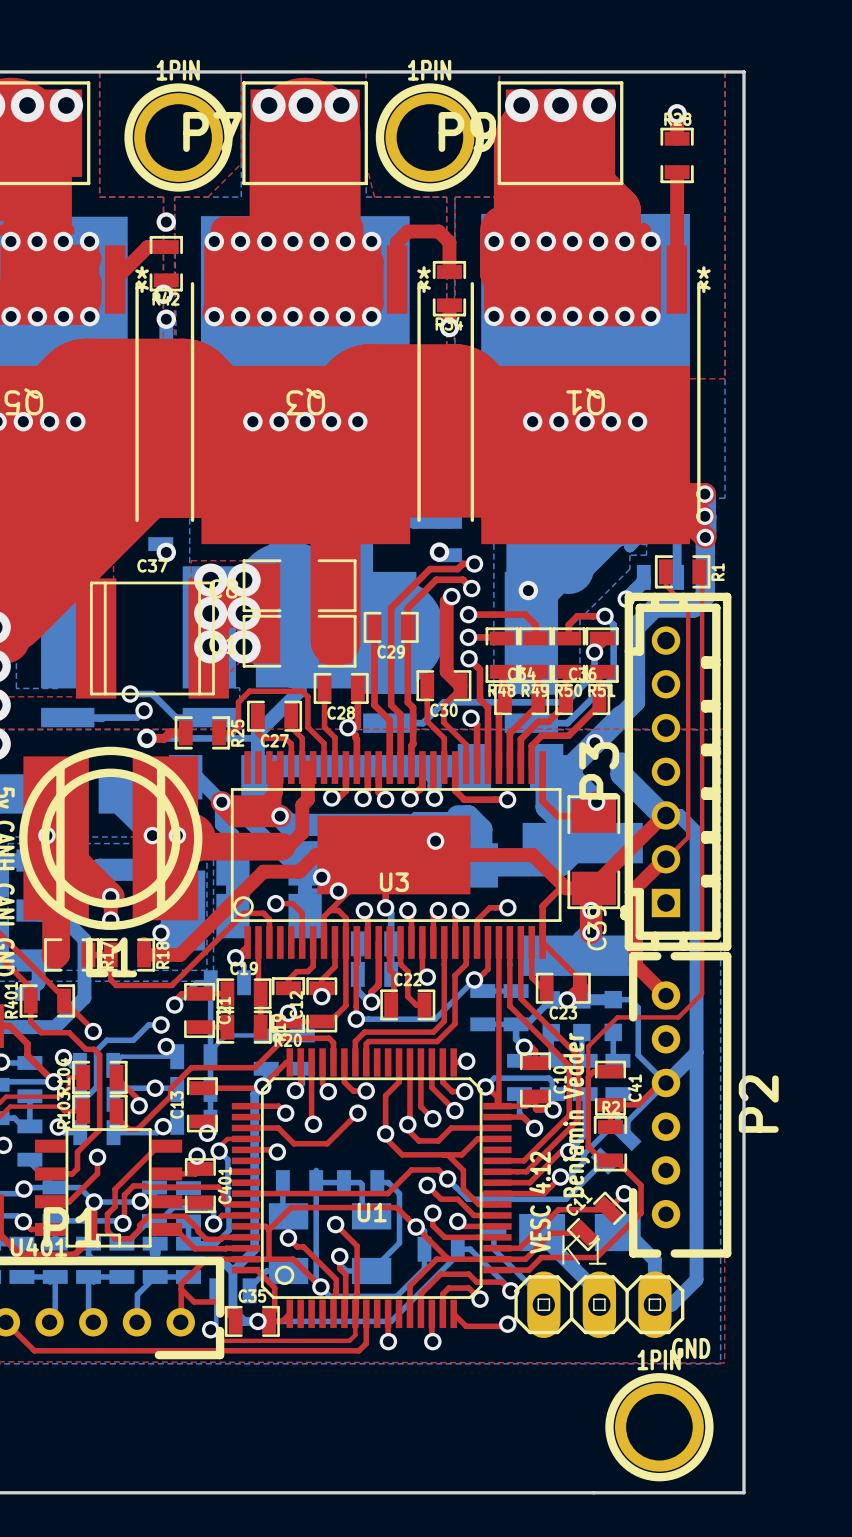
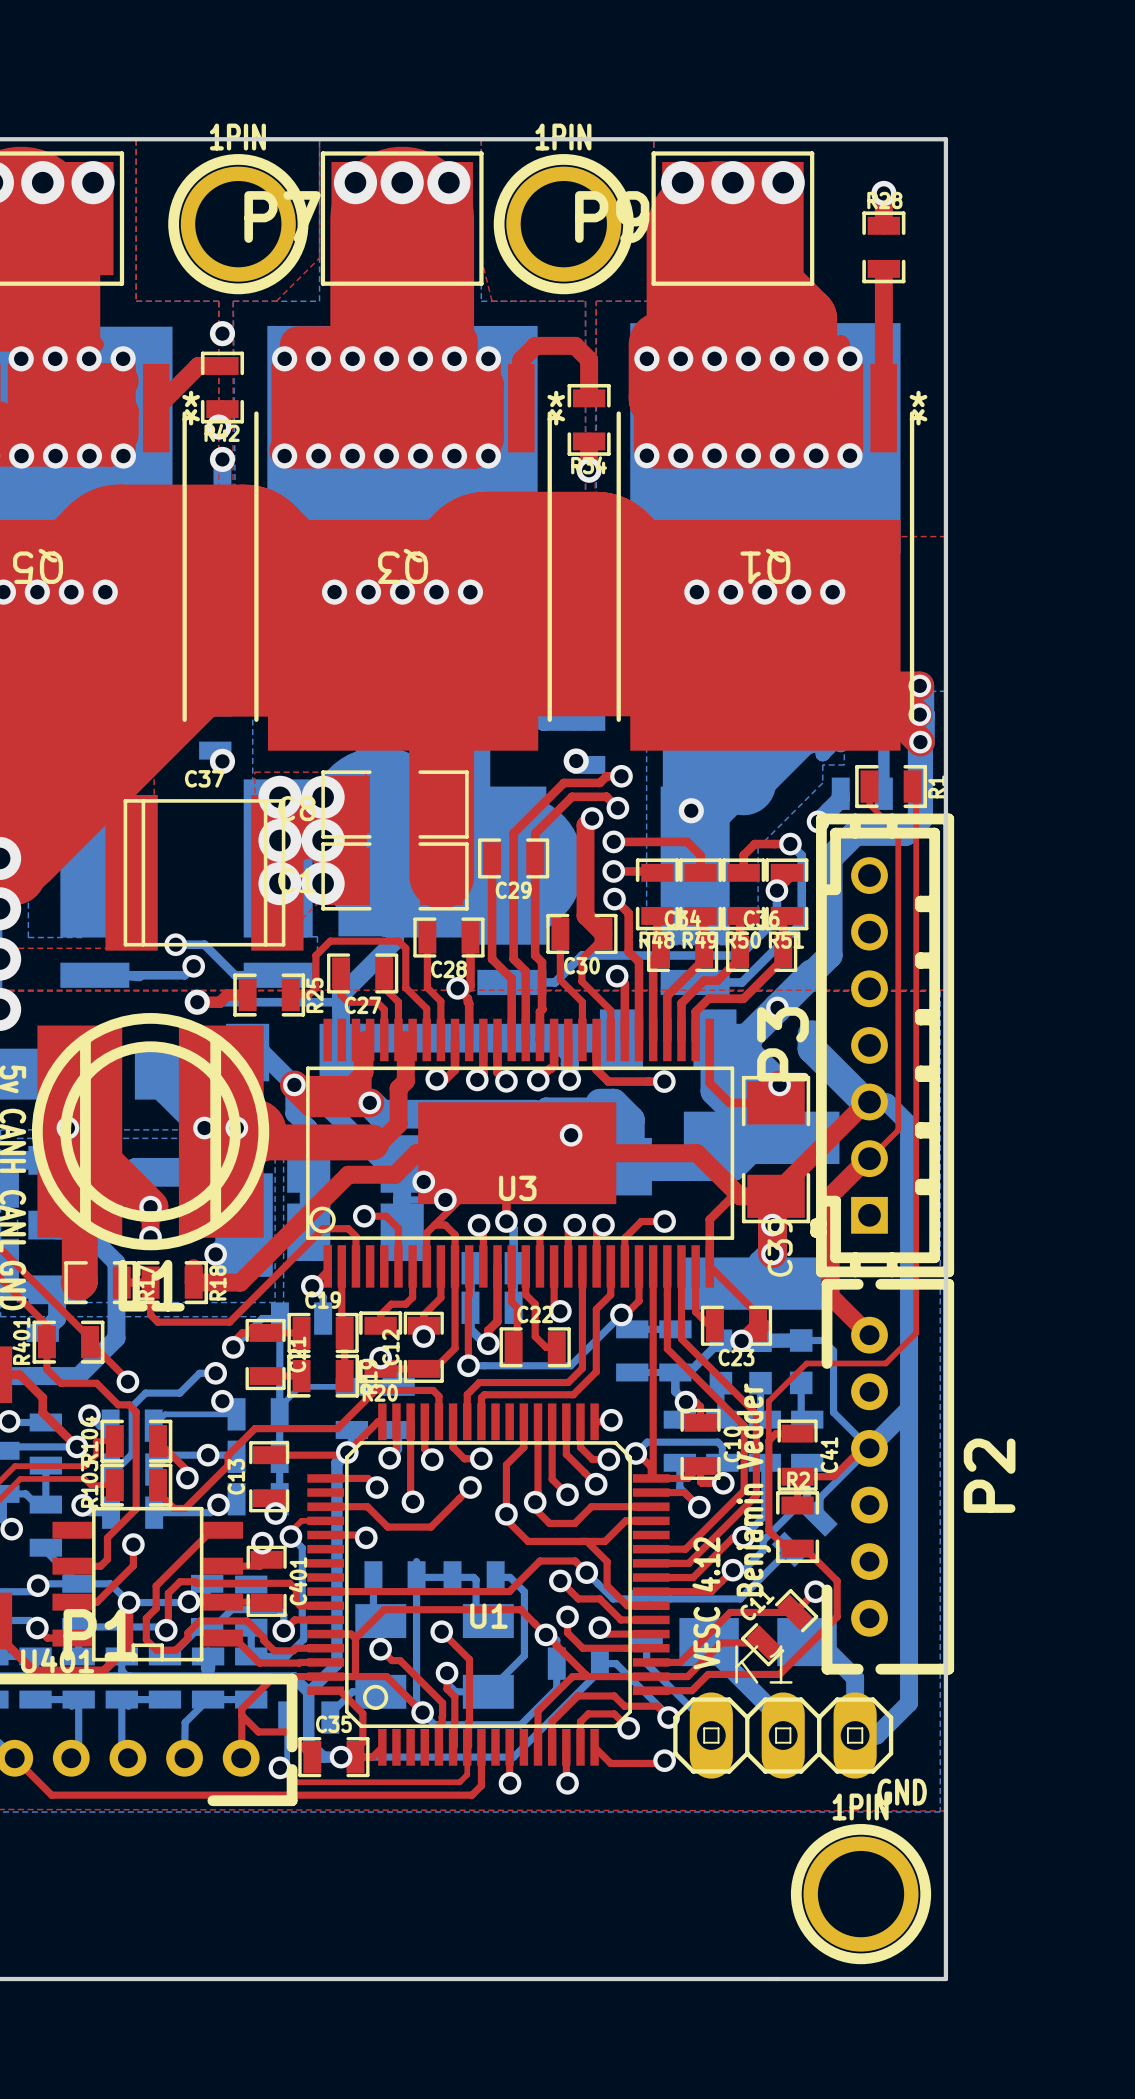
board edge: (725, 71) (743, 71) (743, 1492) (725, 1492) -> (945, 139) (945, 1979)

